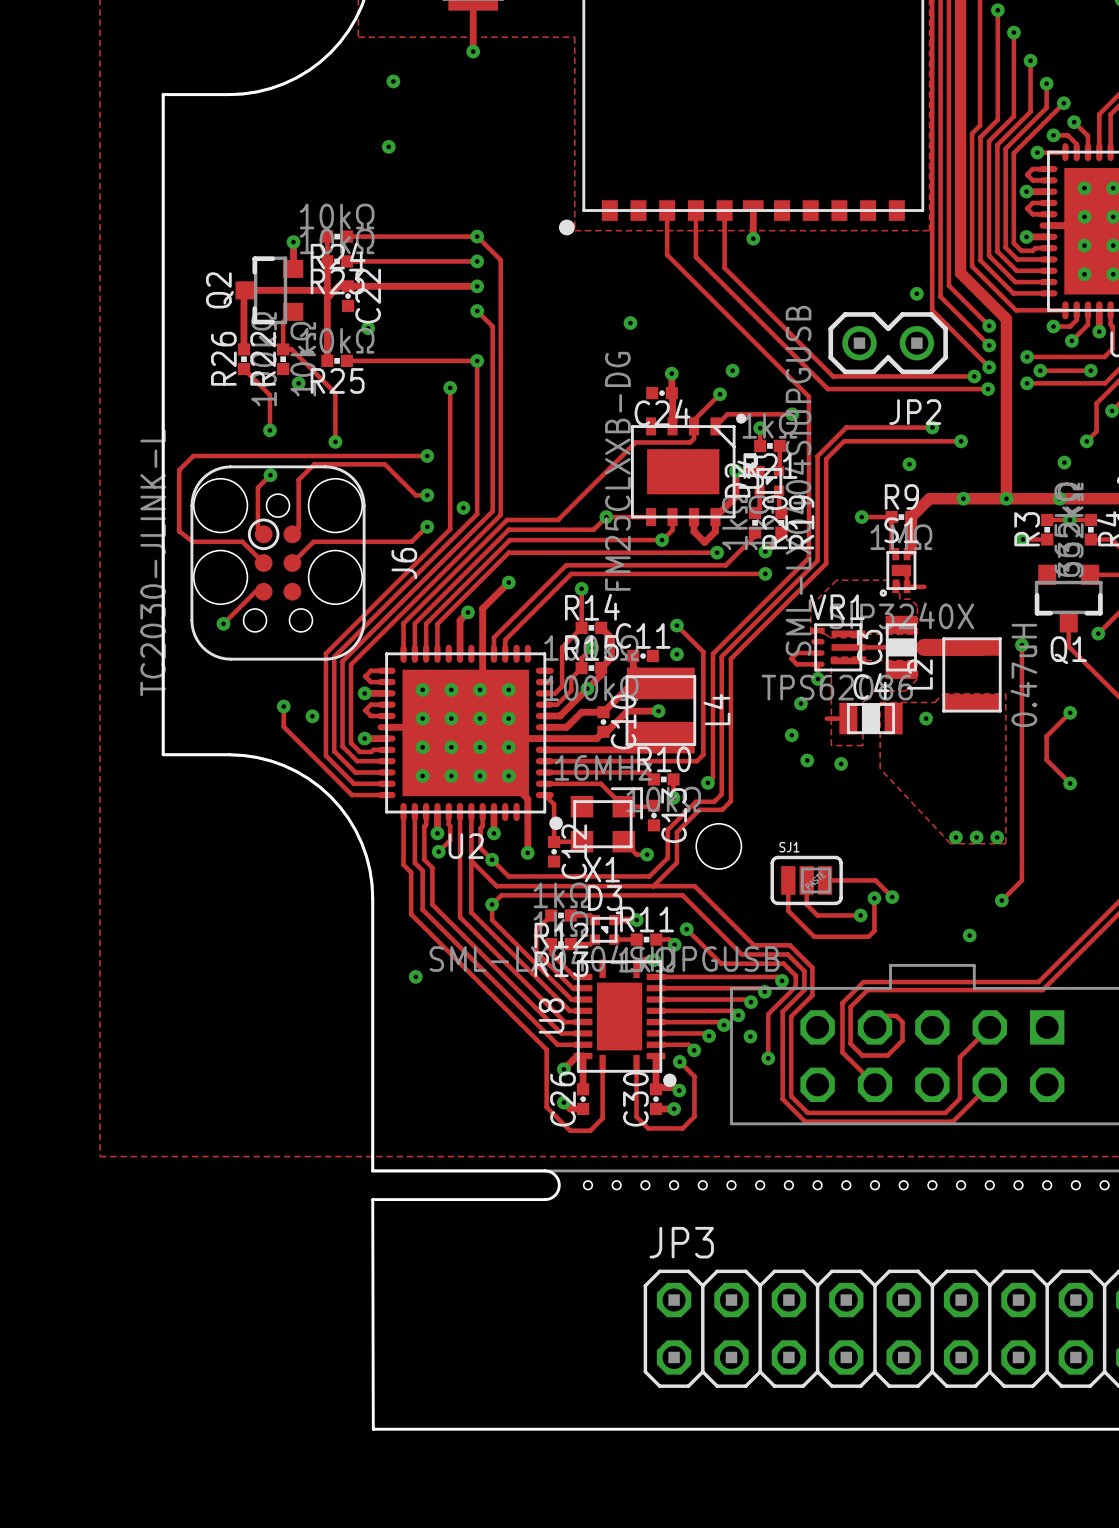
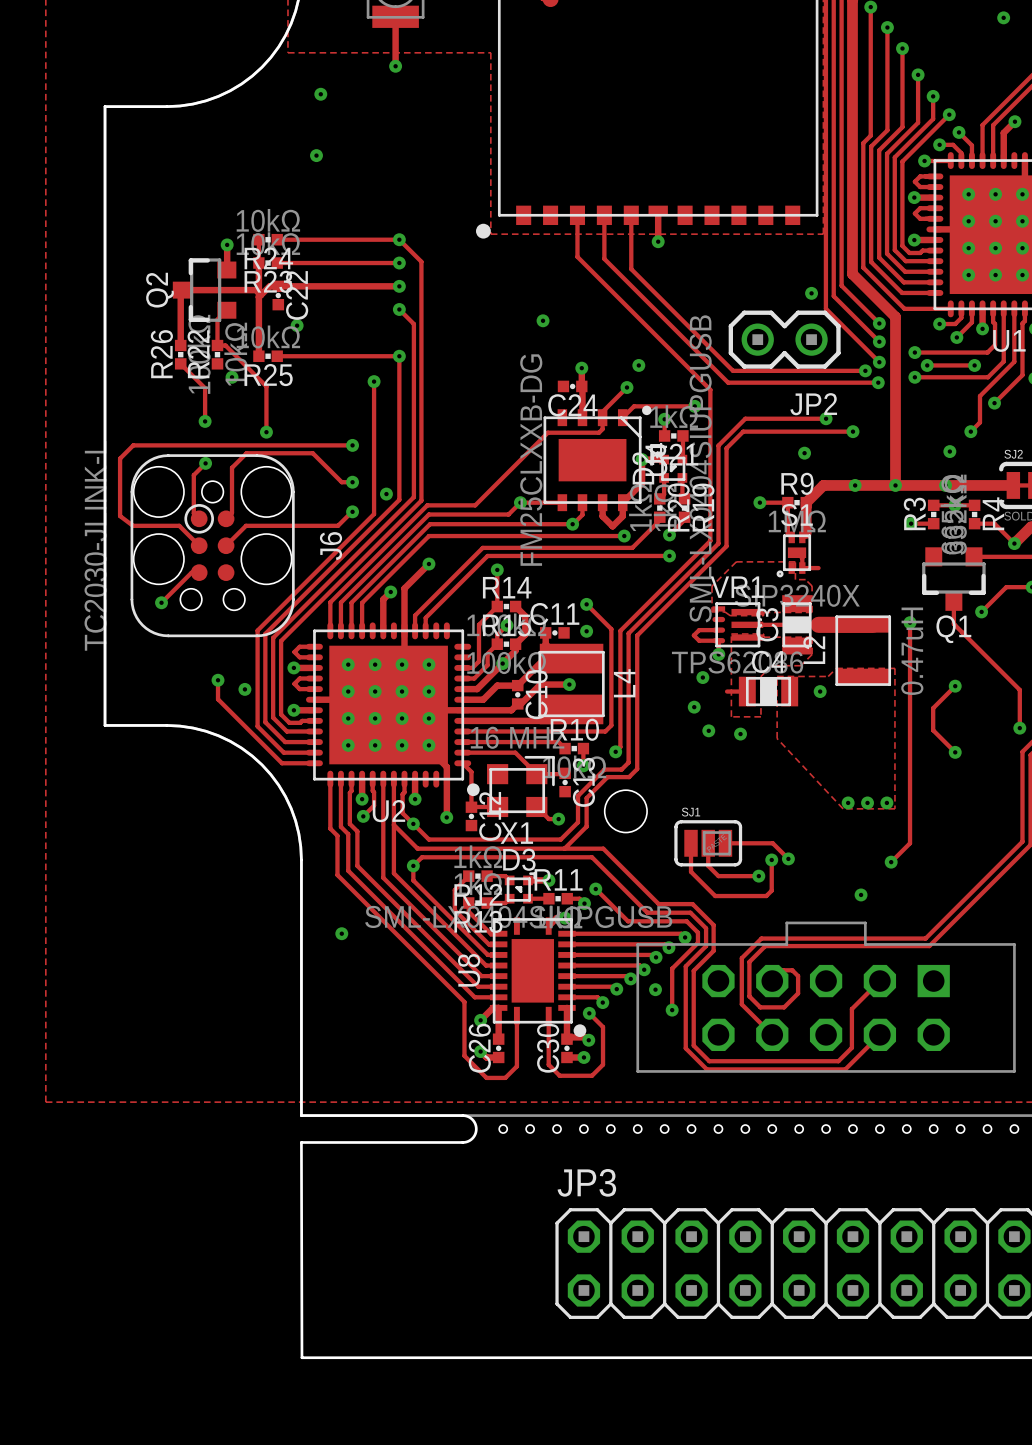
X1 value: 16MHz (603, 767) -> 16 MHz (517, 737)

